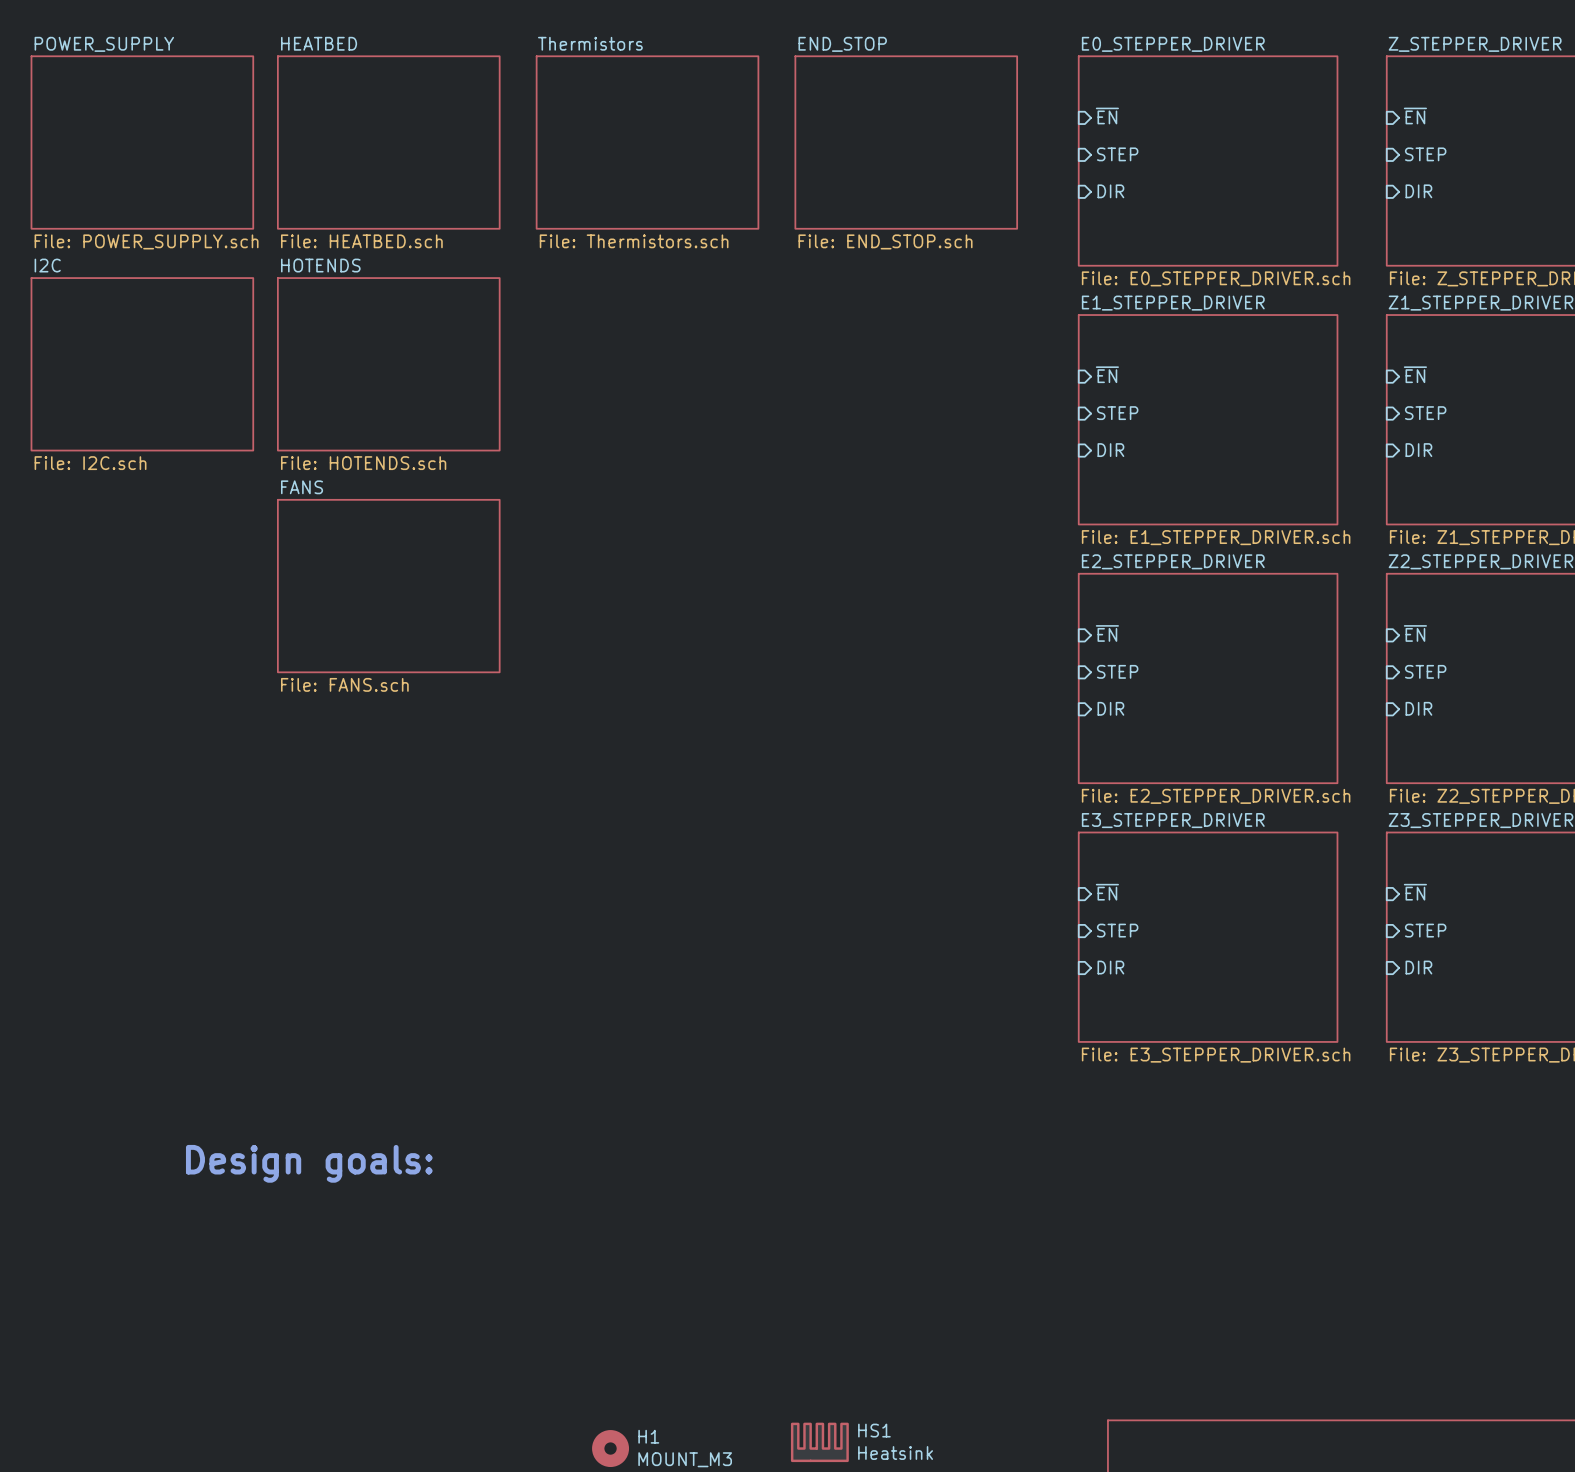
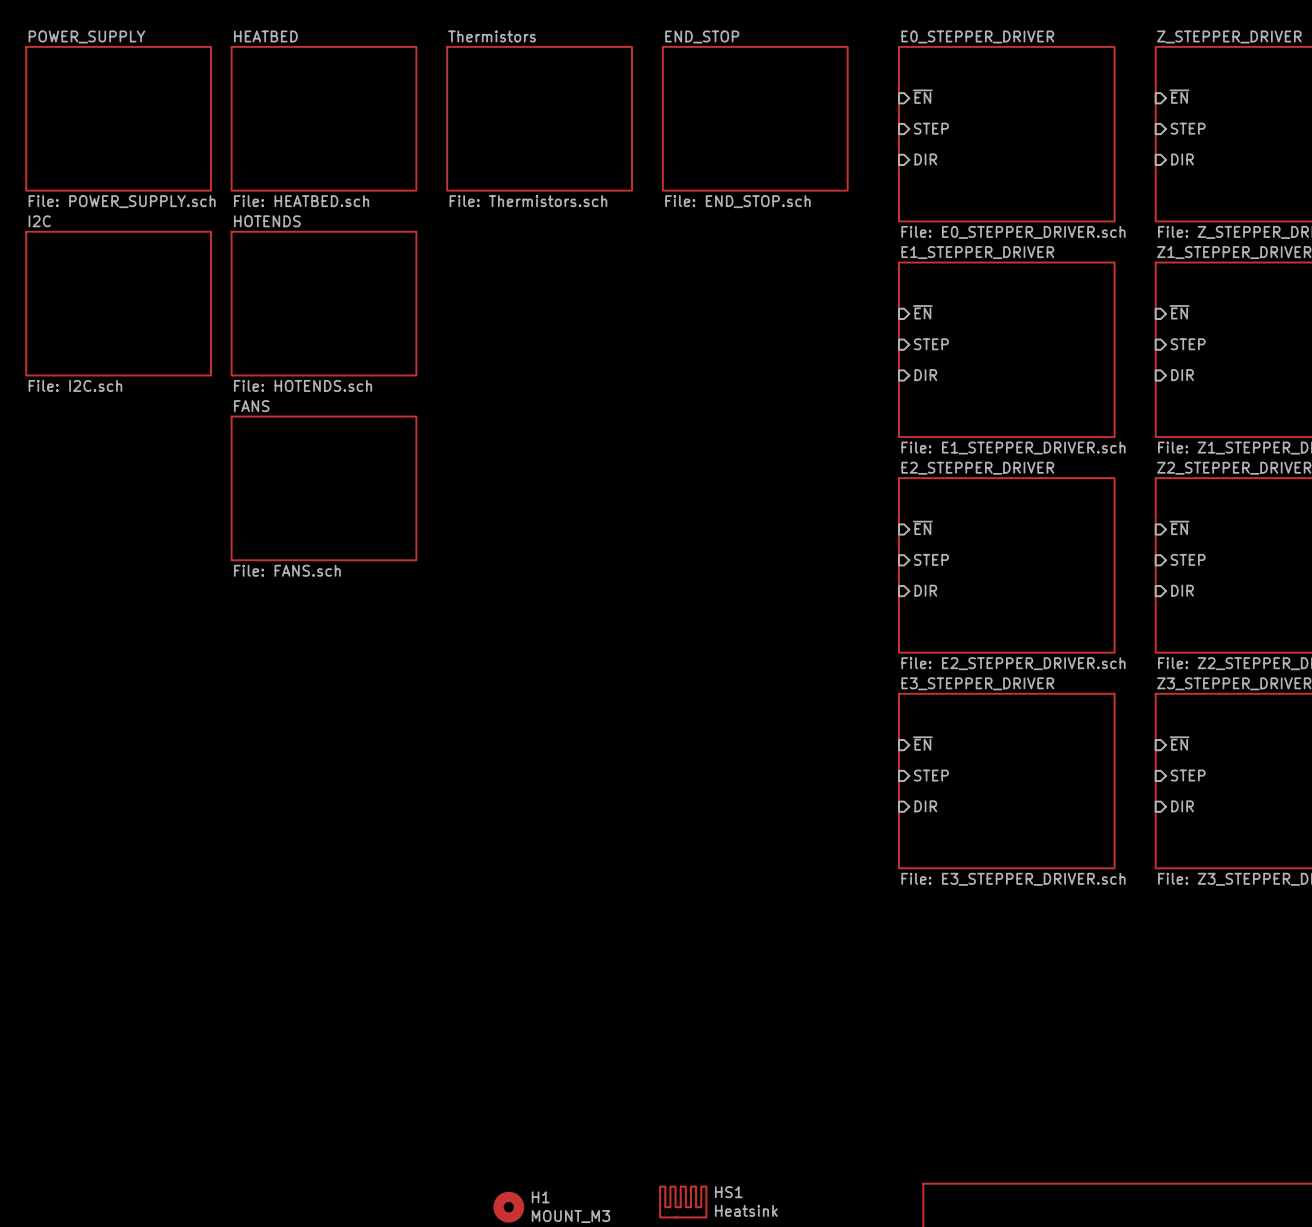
text: Design goals: (309, 1163) -> none

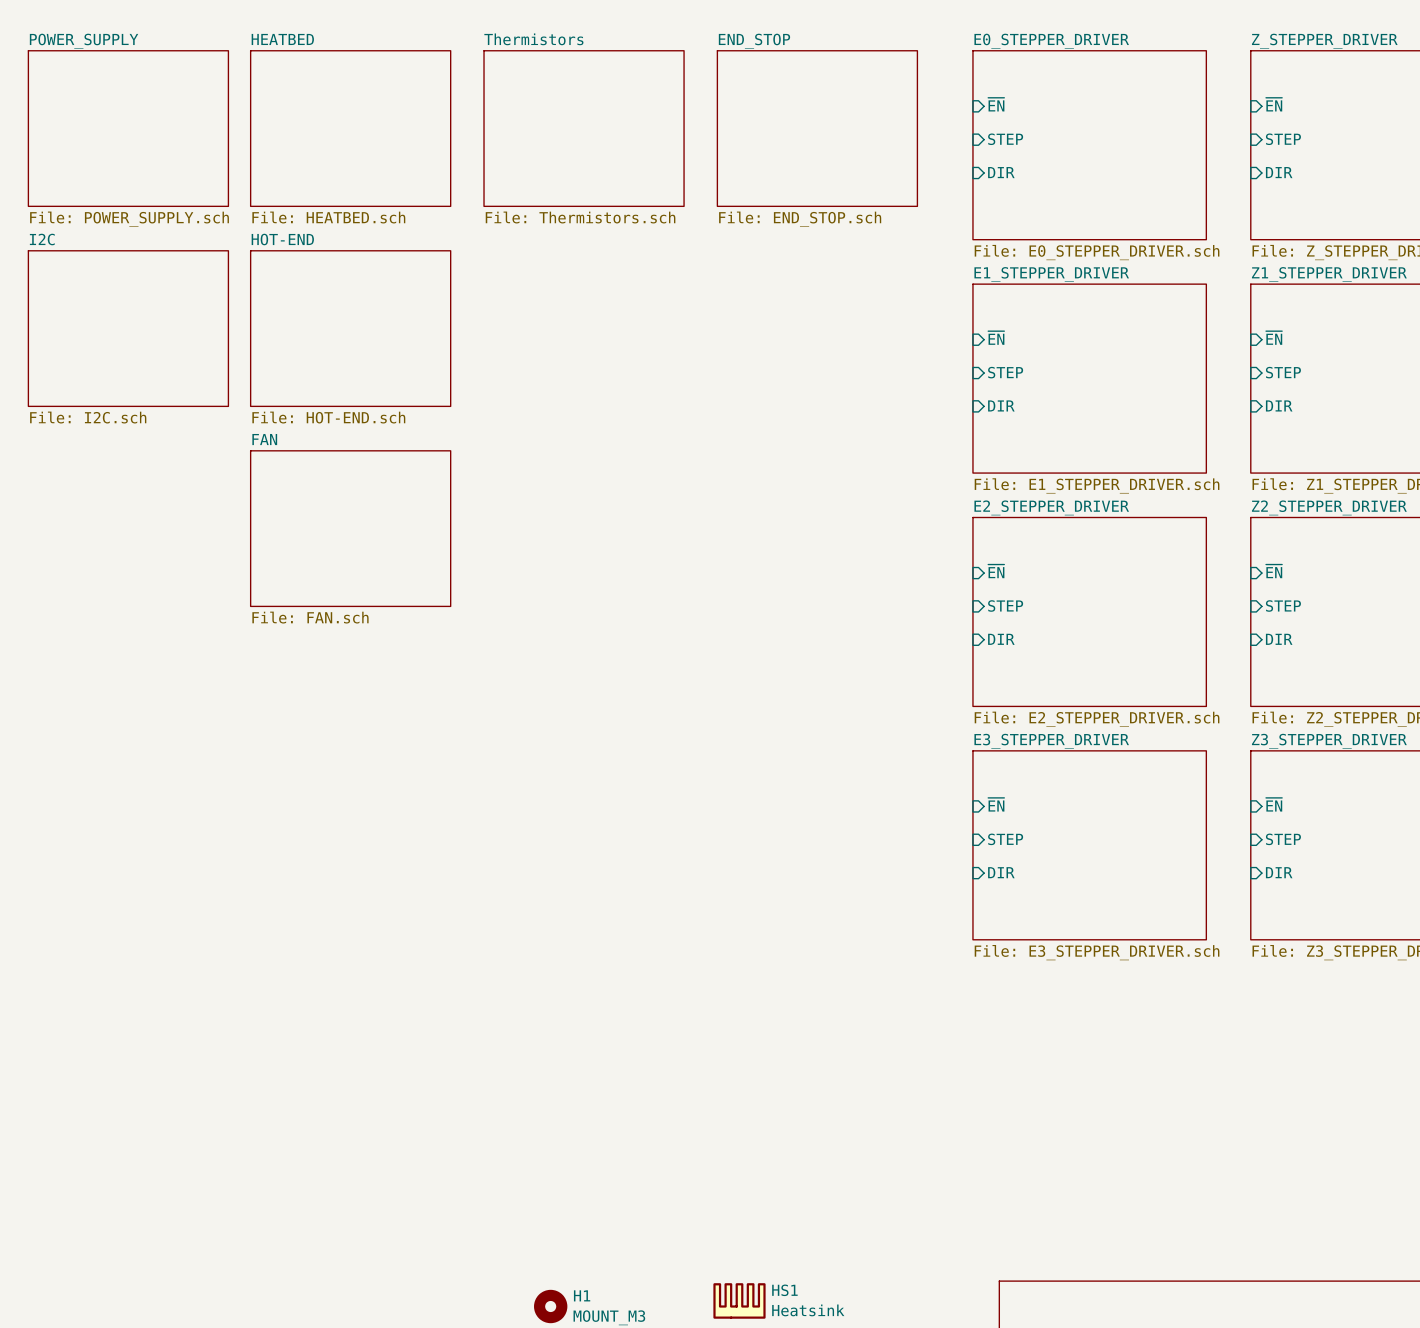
sheet HOTENDS name: HOTENDS (267, 221) -> HOT-END (282, 239)
sheet HOTENDS value: File: HOTENDS.sch (303, 385) -> File: HOT-END.sch (328, 417)
sheet FANS name: FANS (251, 406) -> FAN (264, 439)
sheet FANS value: File: FANS.sch (287, 570) -> File: FAN.sch (310, 617)

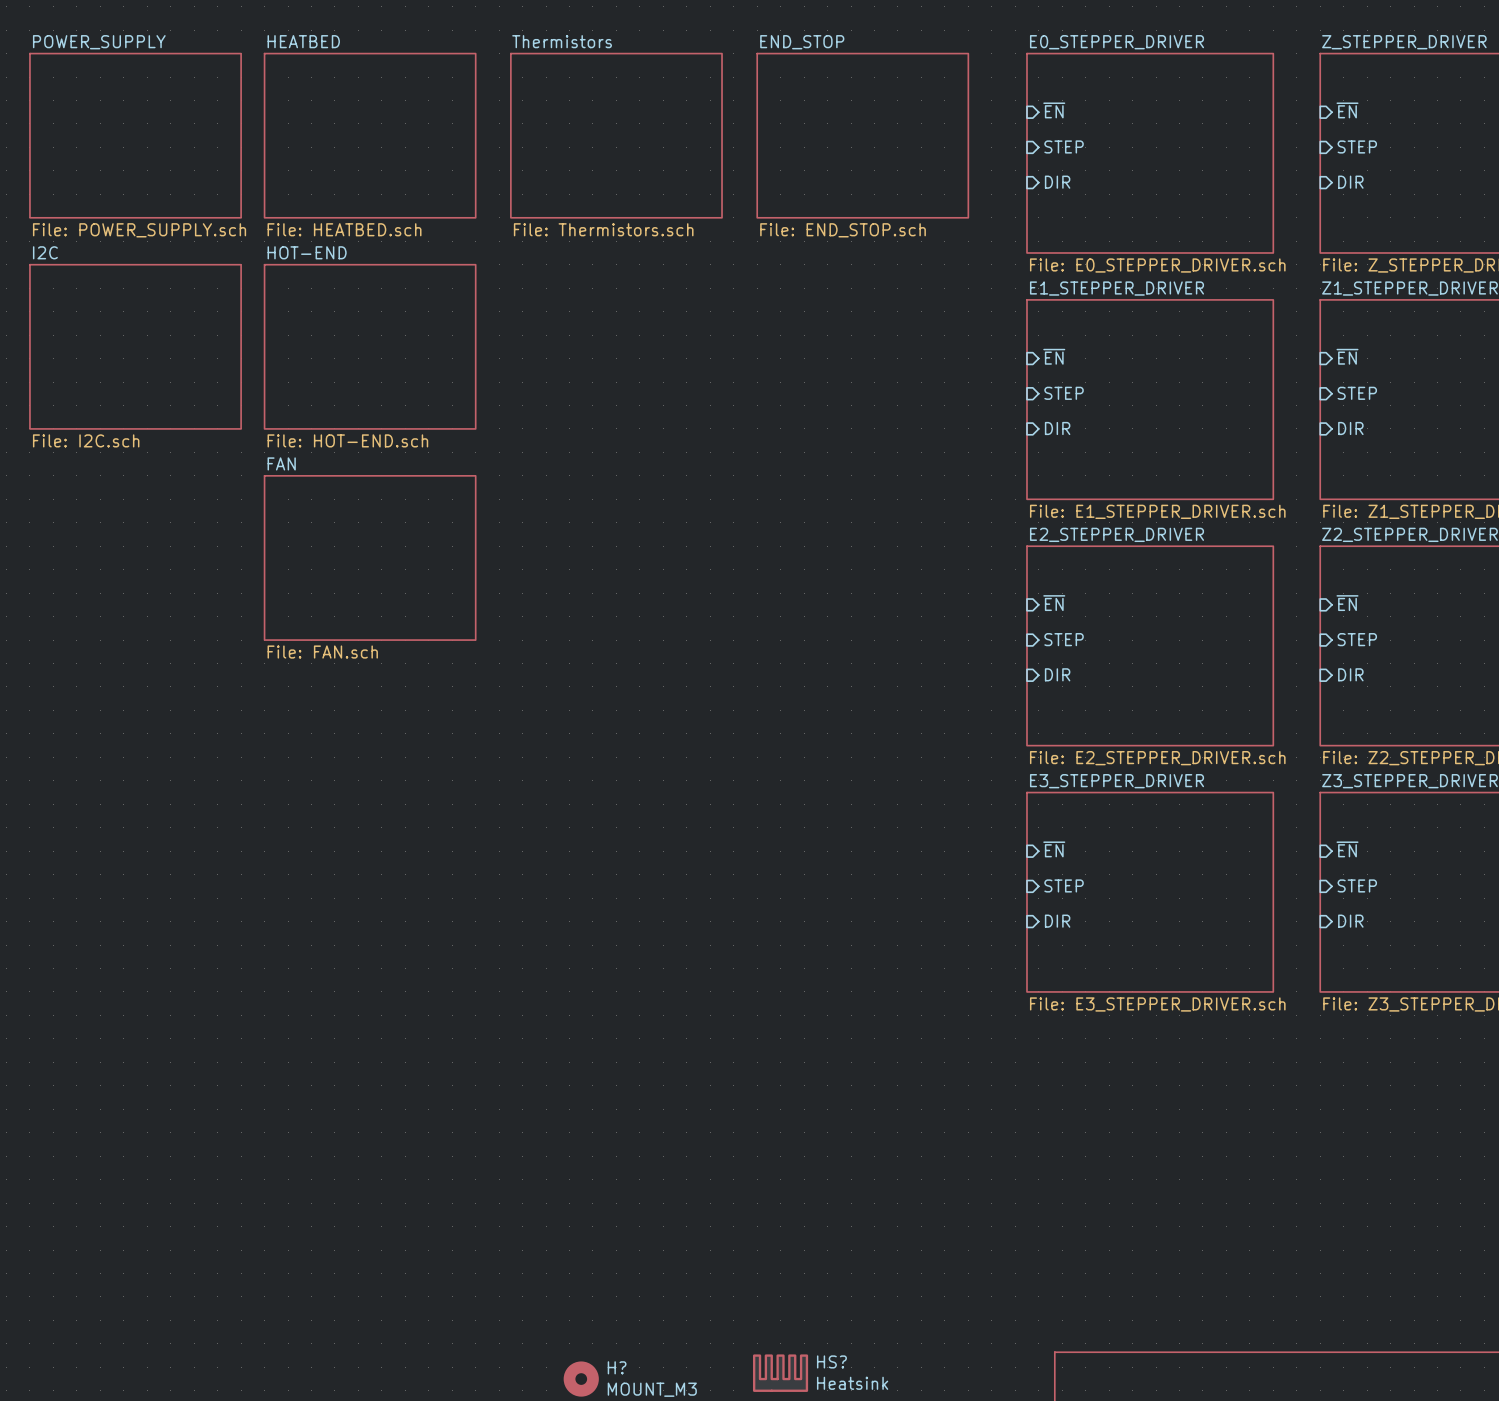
HS1 name: HS1 (784, 1290) -> HS? (831, 1361)
H1 name: H1 (582, 1295) -> H? (617, 1367)

